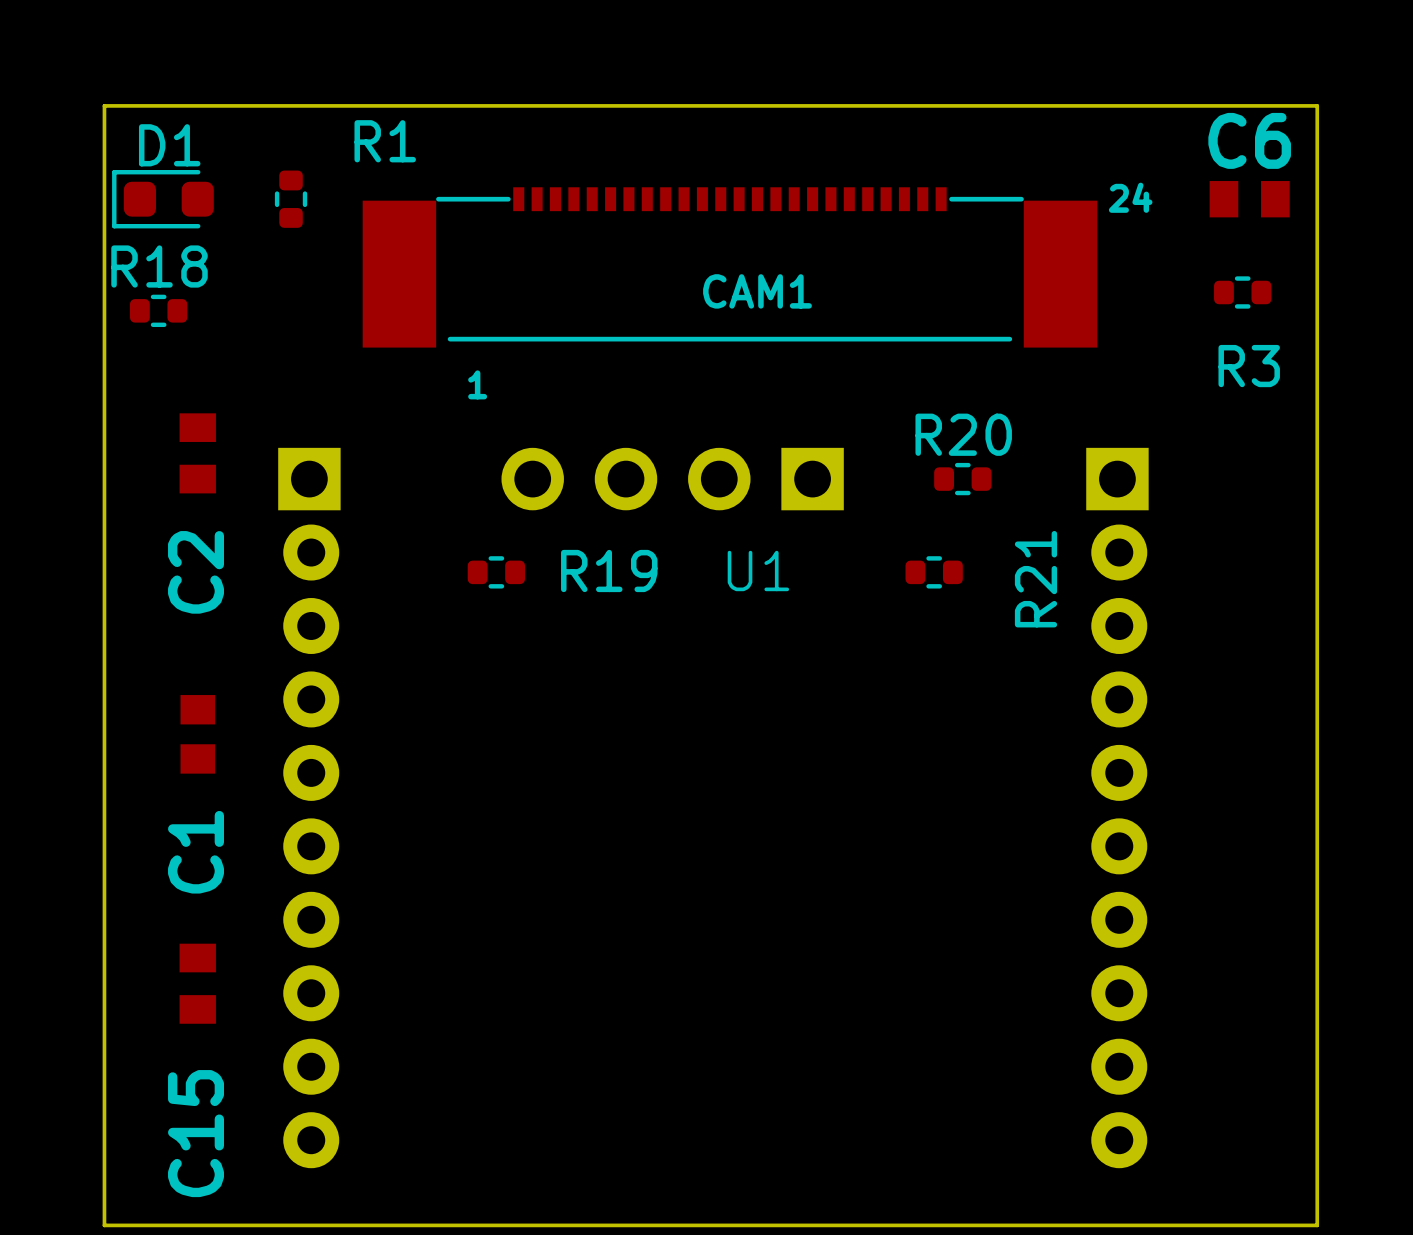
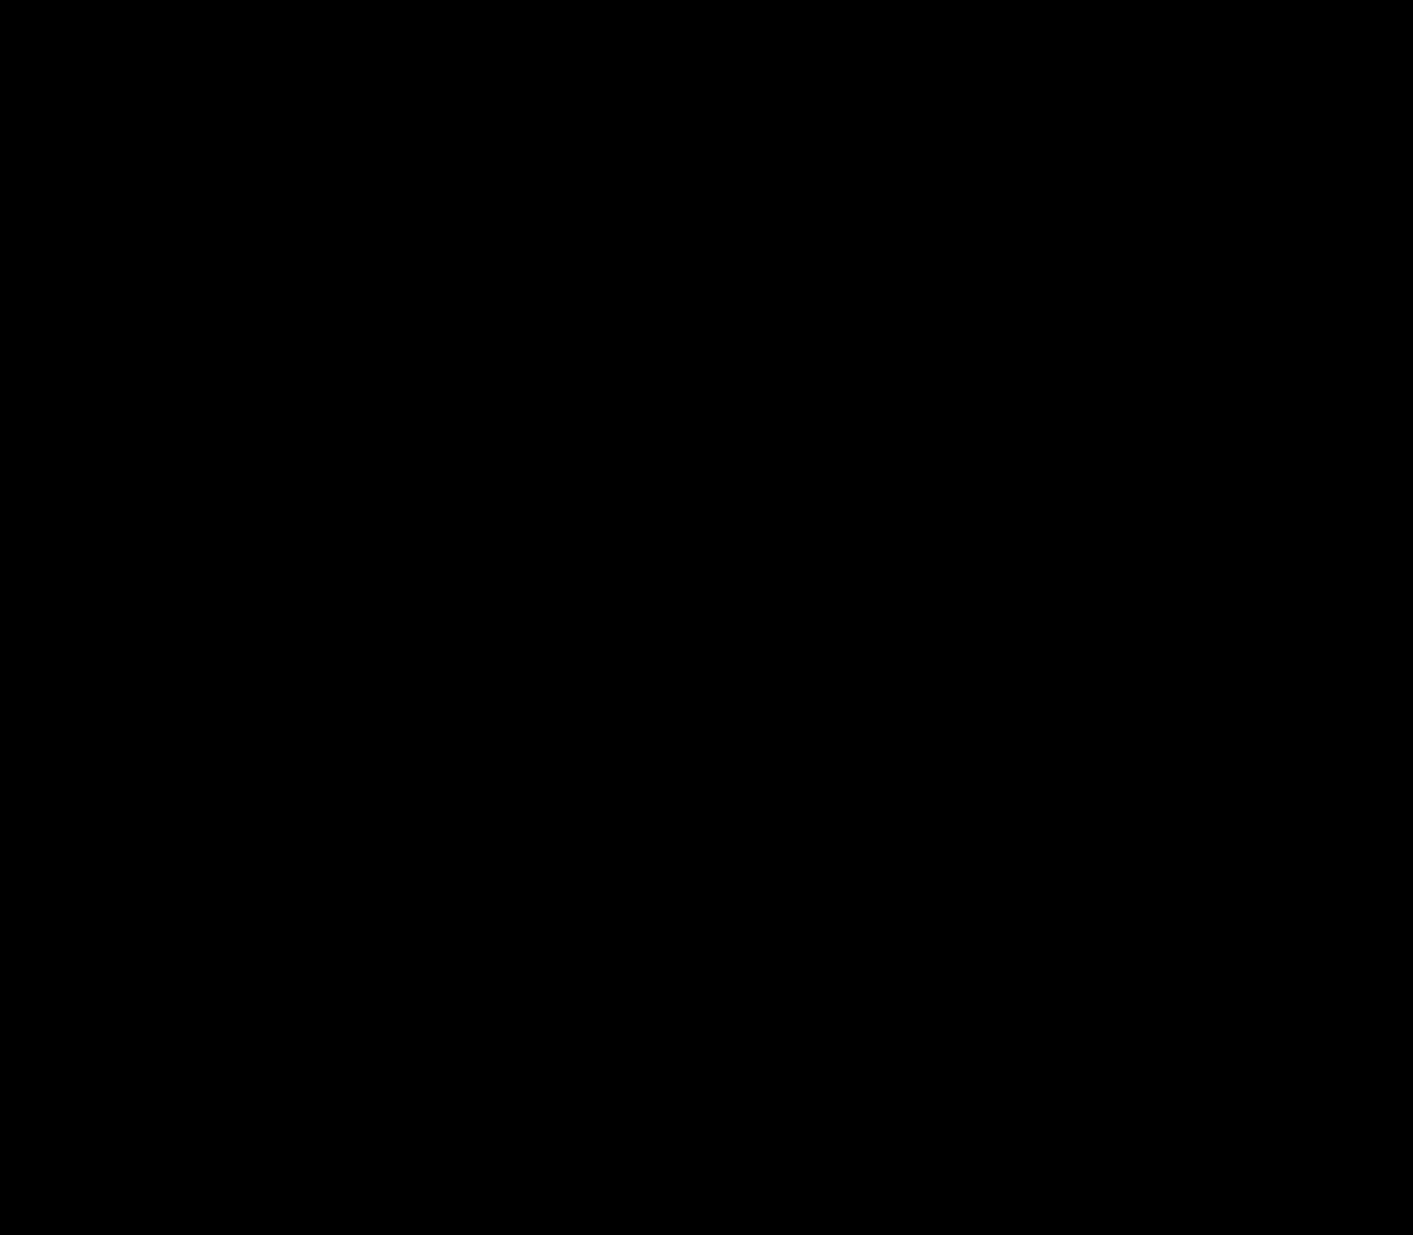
board edge: (104, 105) (1317, 105) (1317, 1225) (104, 1225) (104, 105) -> none
D1: (162, 199) -> none
R1: (291, 199) -> none
C6: (1249, 199) -> none
CAM1: (729, 267) -> none
R3: (1242, 292) -> none
R18: (158, 310) -> none
C2: (197, 453) -> none
part: (672, 479) -> none
R20: (962, 479) -> none
U1: (758, 570) -> none
R19: (496, 572) -> none
R21: (934, 572) -> none
C1: (197, 734) -> none
part: (309, 808) -> none
part: (1117, 808) -> none
C15: (197, 983) -> none

